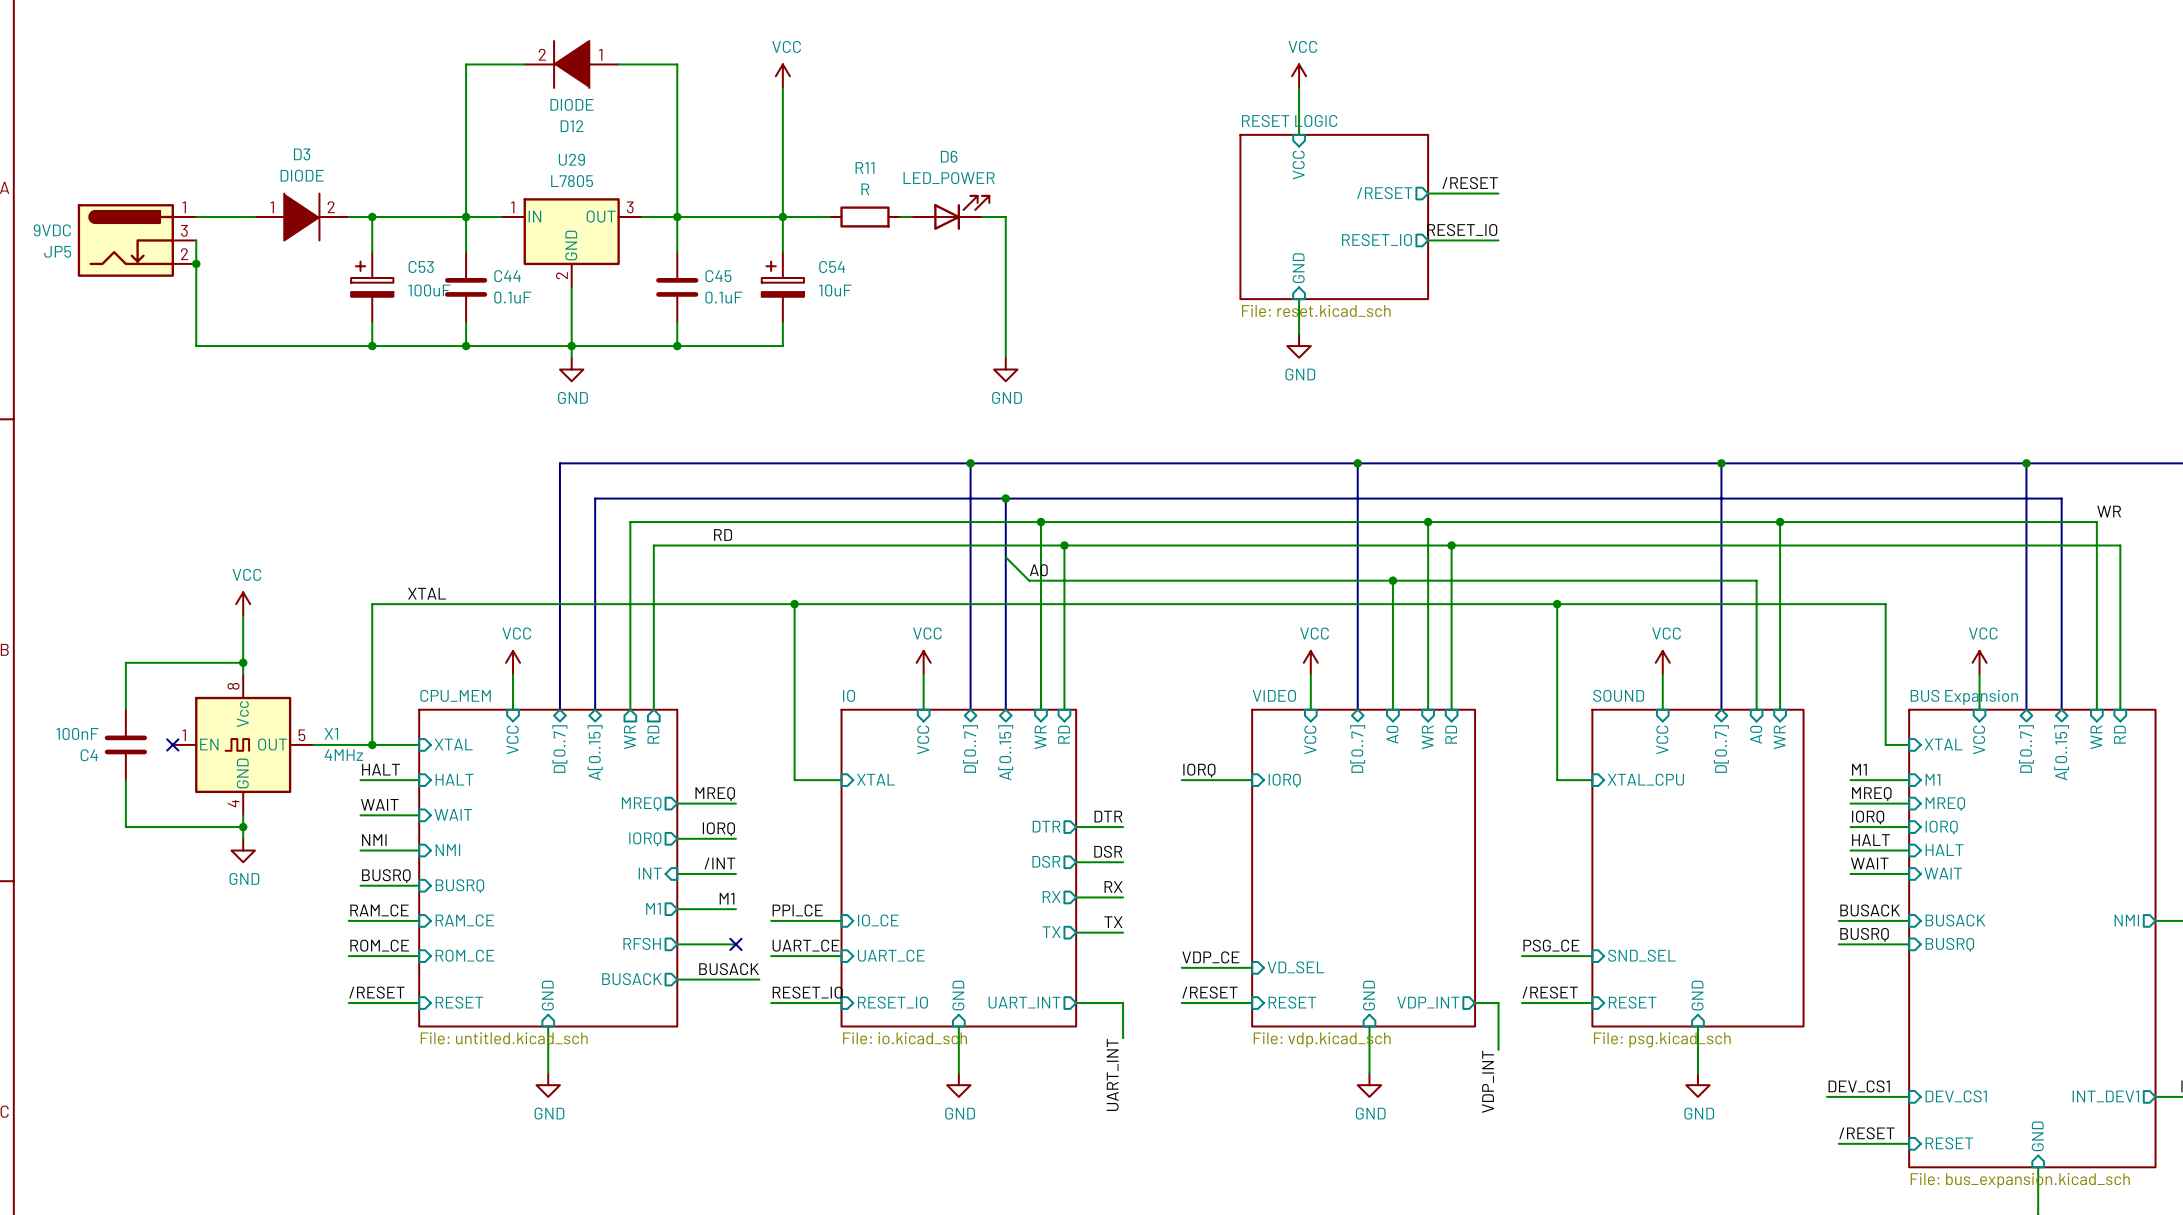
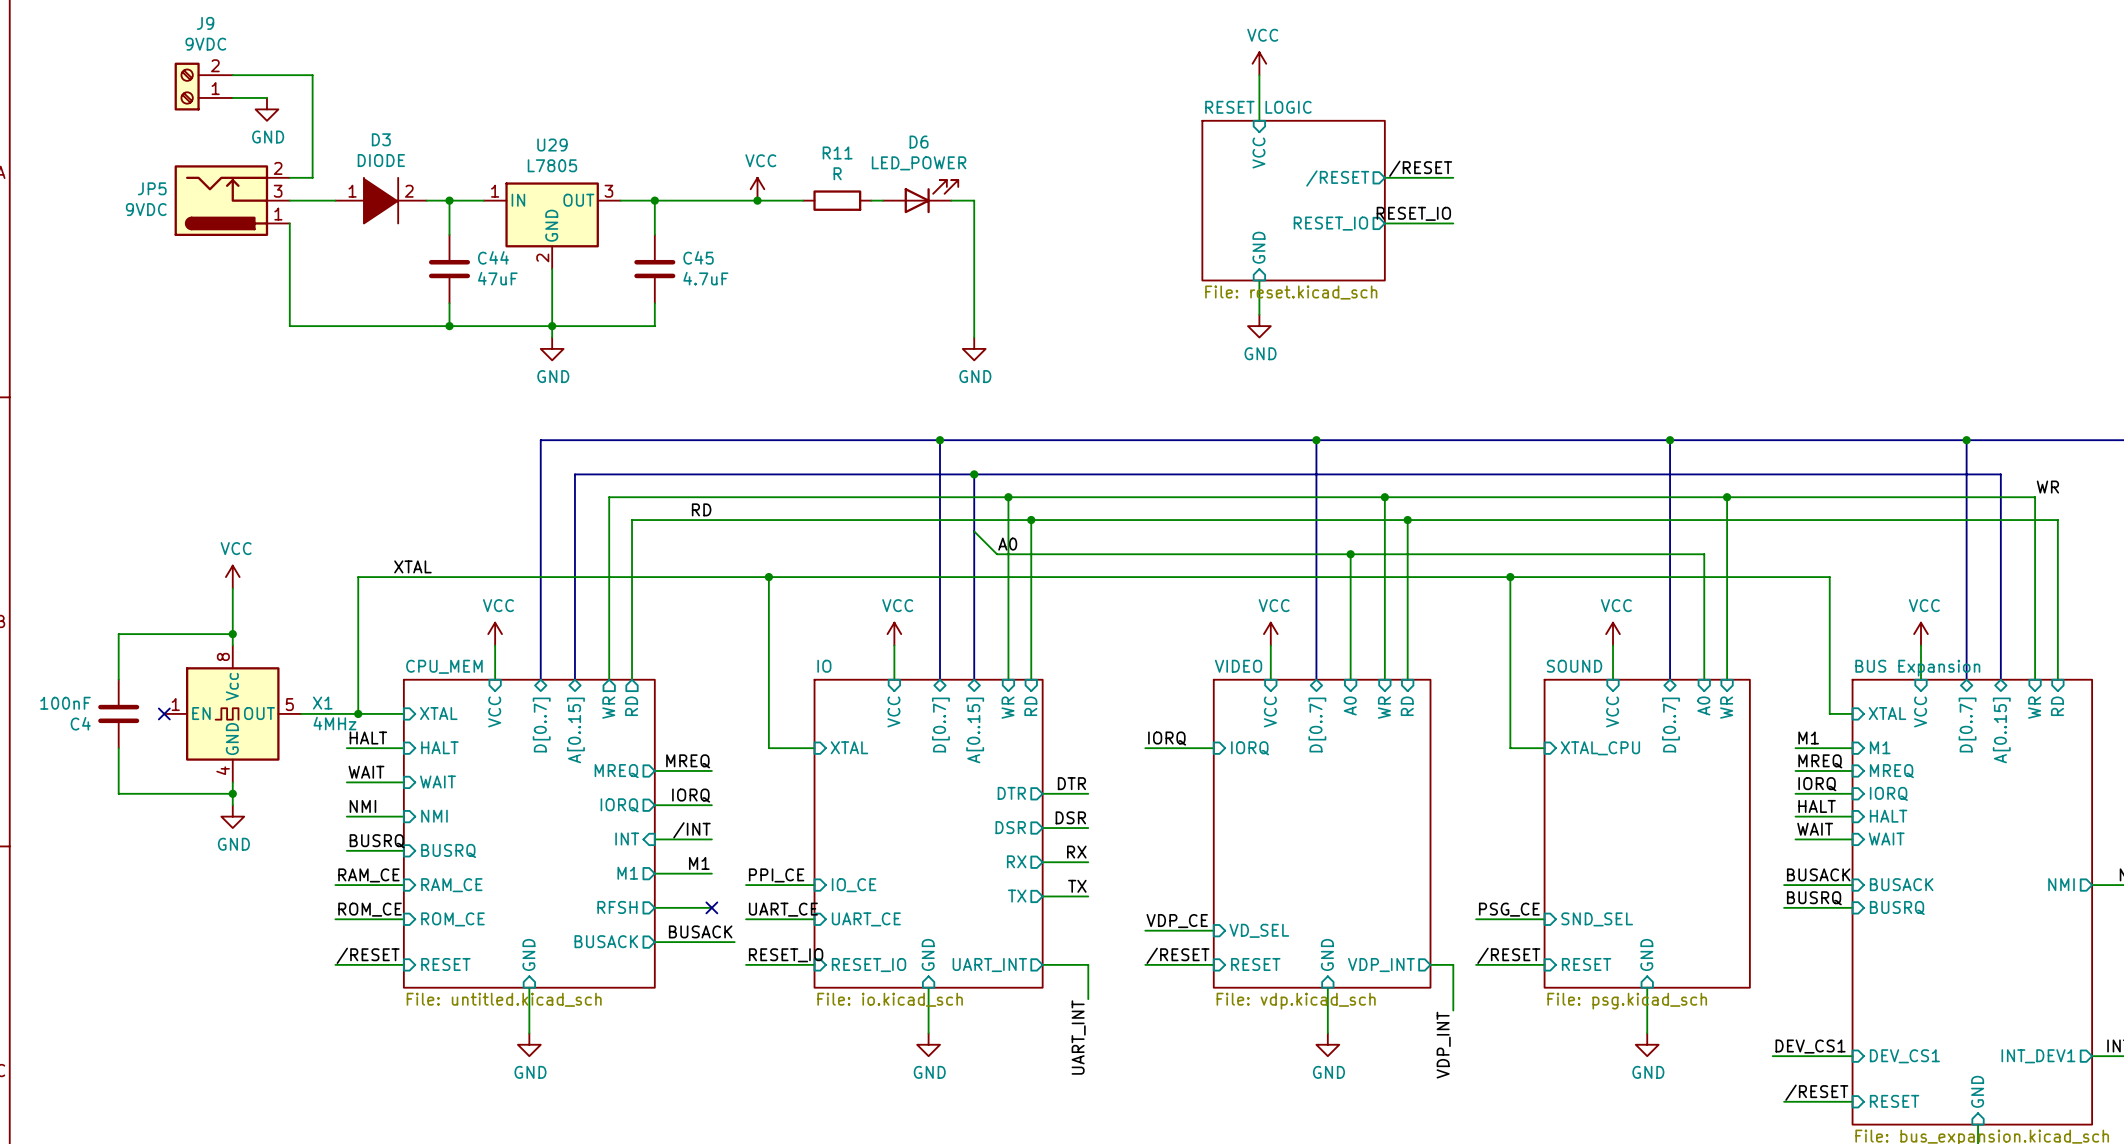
wire: (524, 64) (466, 64) (466, 216) -> none
D12: DIODE (571, 64) -> none
wire: (618, 64) (677, 64) (677, 216) -> none
power symbol position: VCC (782, 76) -> VCC (757, 189)
wire: none -> (232, 75) (312, 75) (312, 177) (289, 177)
wire: (782, 87) (782, 252) -> none
J9: none -> 9VDC (203, 86)
wire: none -> (232, 97) (266, 97)
power symbol: none -> GND (266, 109)
D3 position: (301, 216) -> (381, 200)
wire: (372, 216) (372, 252) -> none
junction: (372, 216) -> none
JP5 flip: as is (125, 240) -> up-down (221, 200)
JP5 position: (137, 240) -> (232, 200)
wire: (196, 240) (196, 346) (301, 346) -> (289, 223) (289, 326)
junction: (196, 263) -> none
C53: 100uF (372, 287) -> none
C54: 10uF (782, 287) -> none
C44 value: 0.1uF (512, 297) -> 47uF (497, 278)
C45 value: 0.1uF (723, 297) -> 4.7uF (705, 278)
wire: (372, 322) (372, 346) -> none
wire: (782, 322) (782, 346) (677, 346) -> none
junction: (372, 346) -> none
junction: (677, 346) -> none

